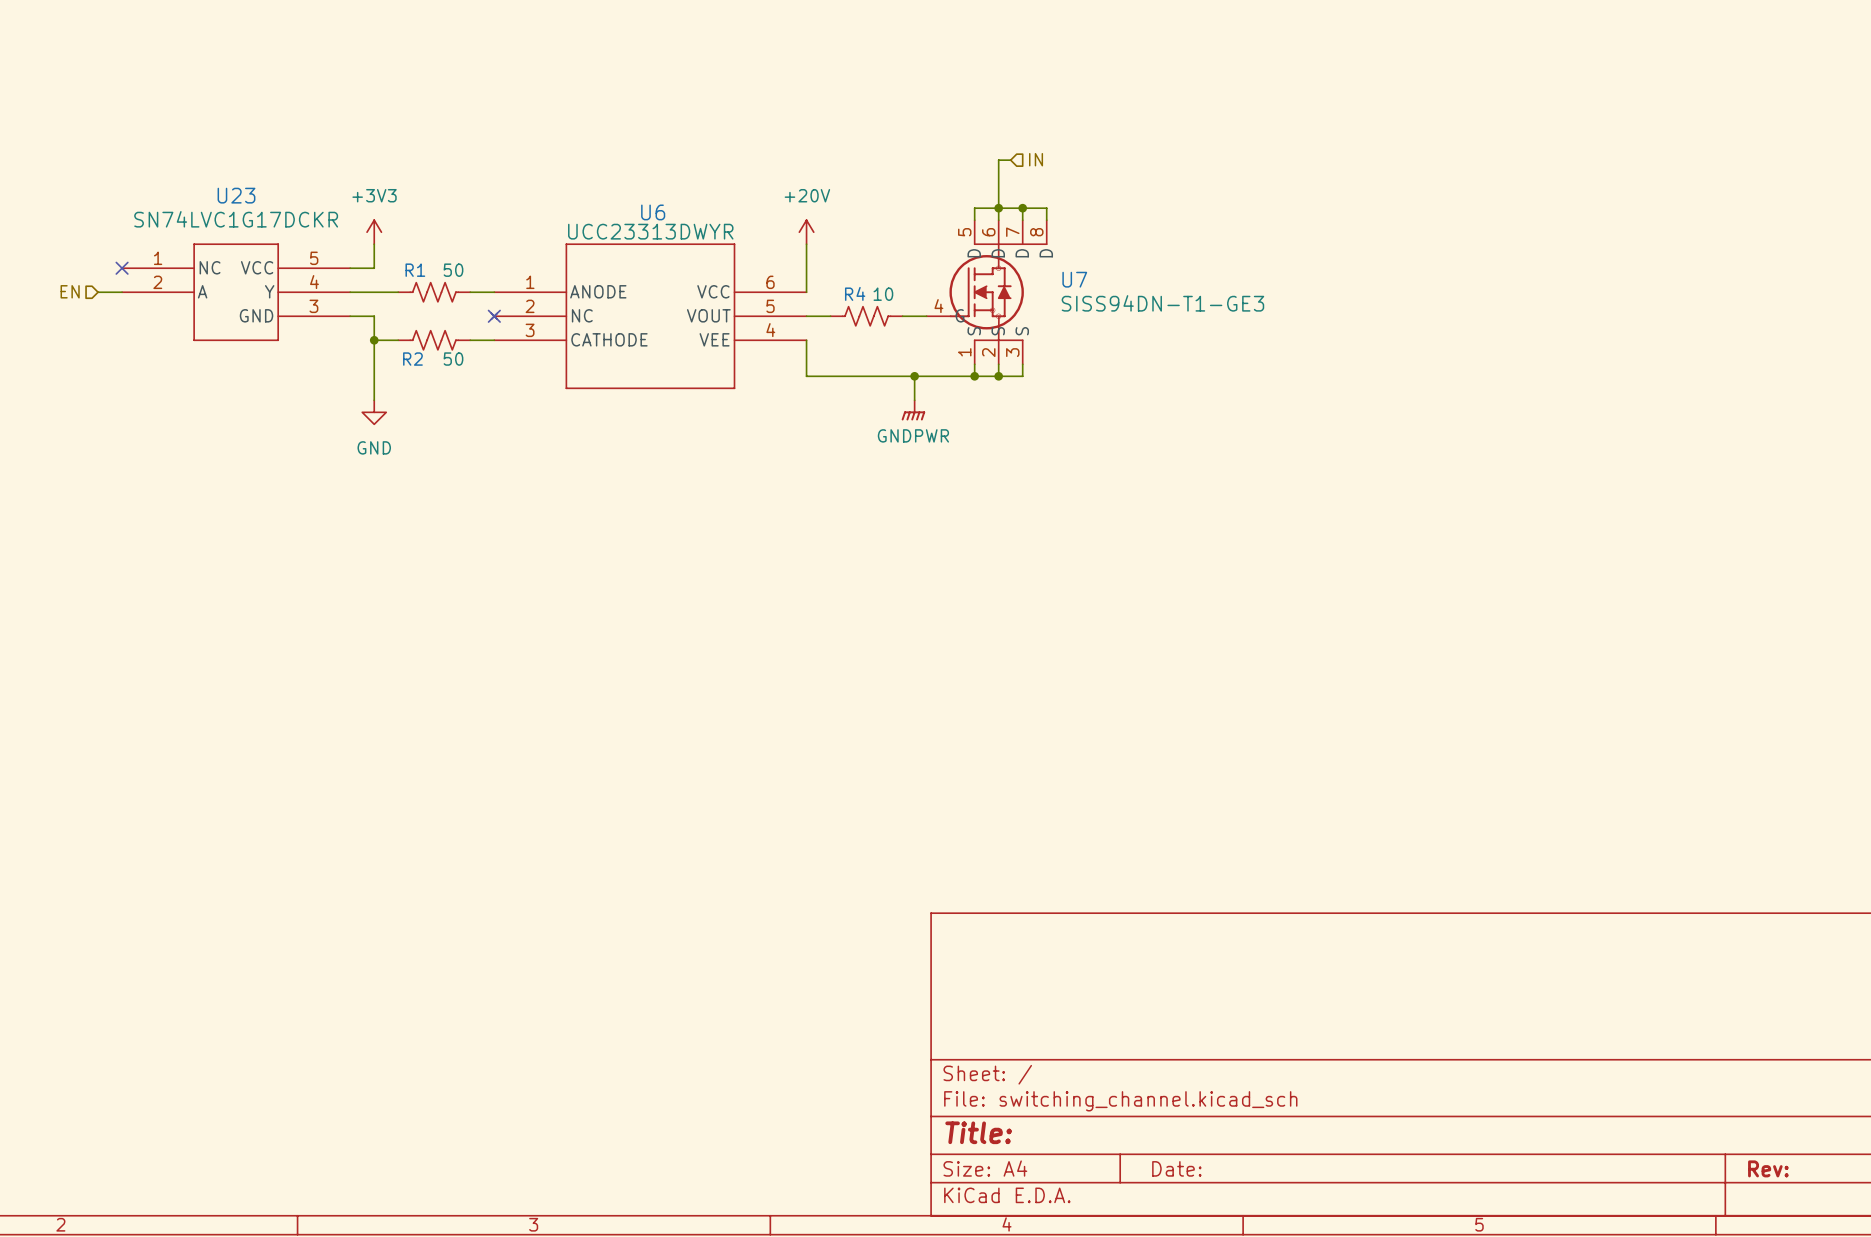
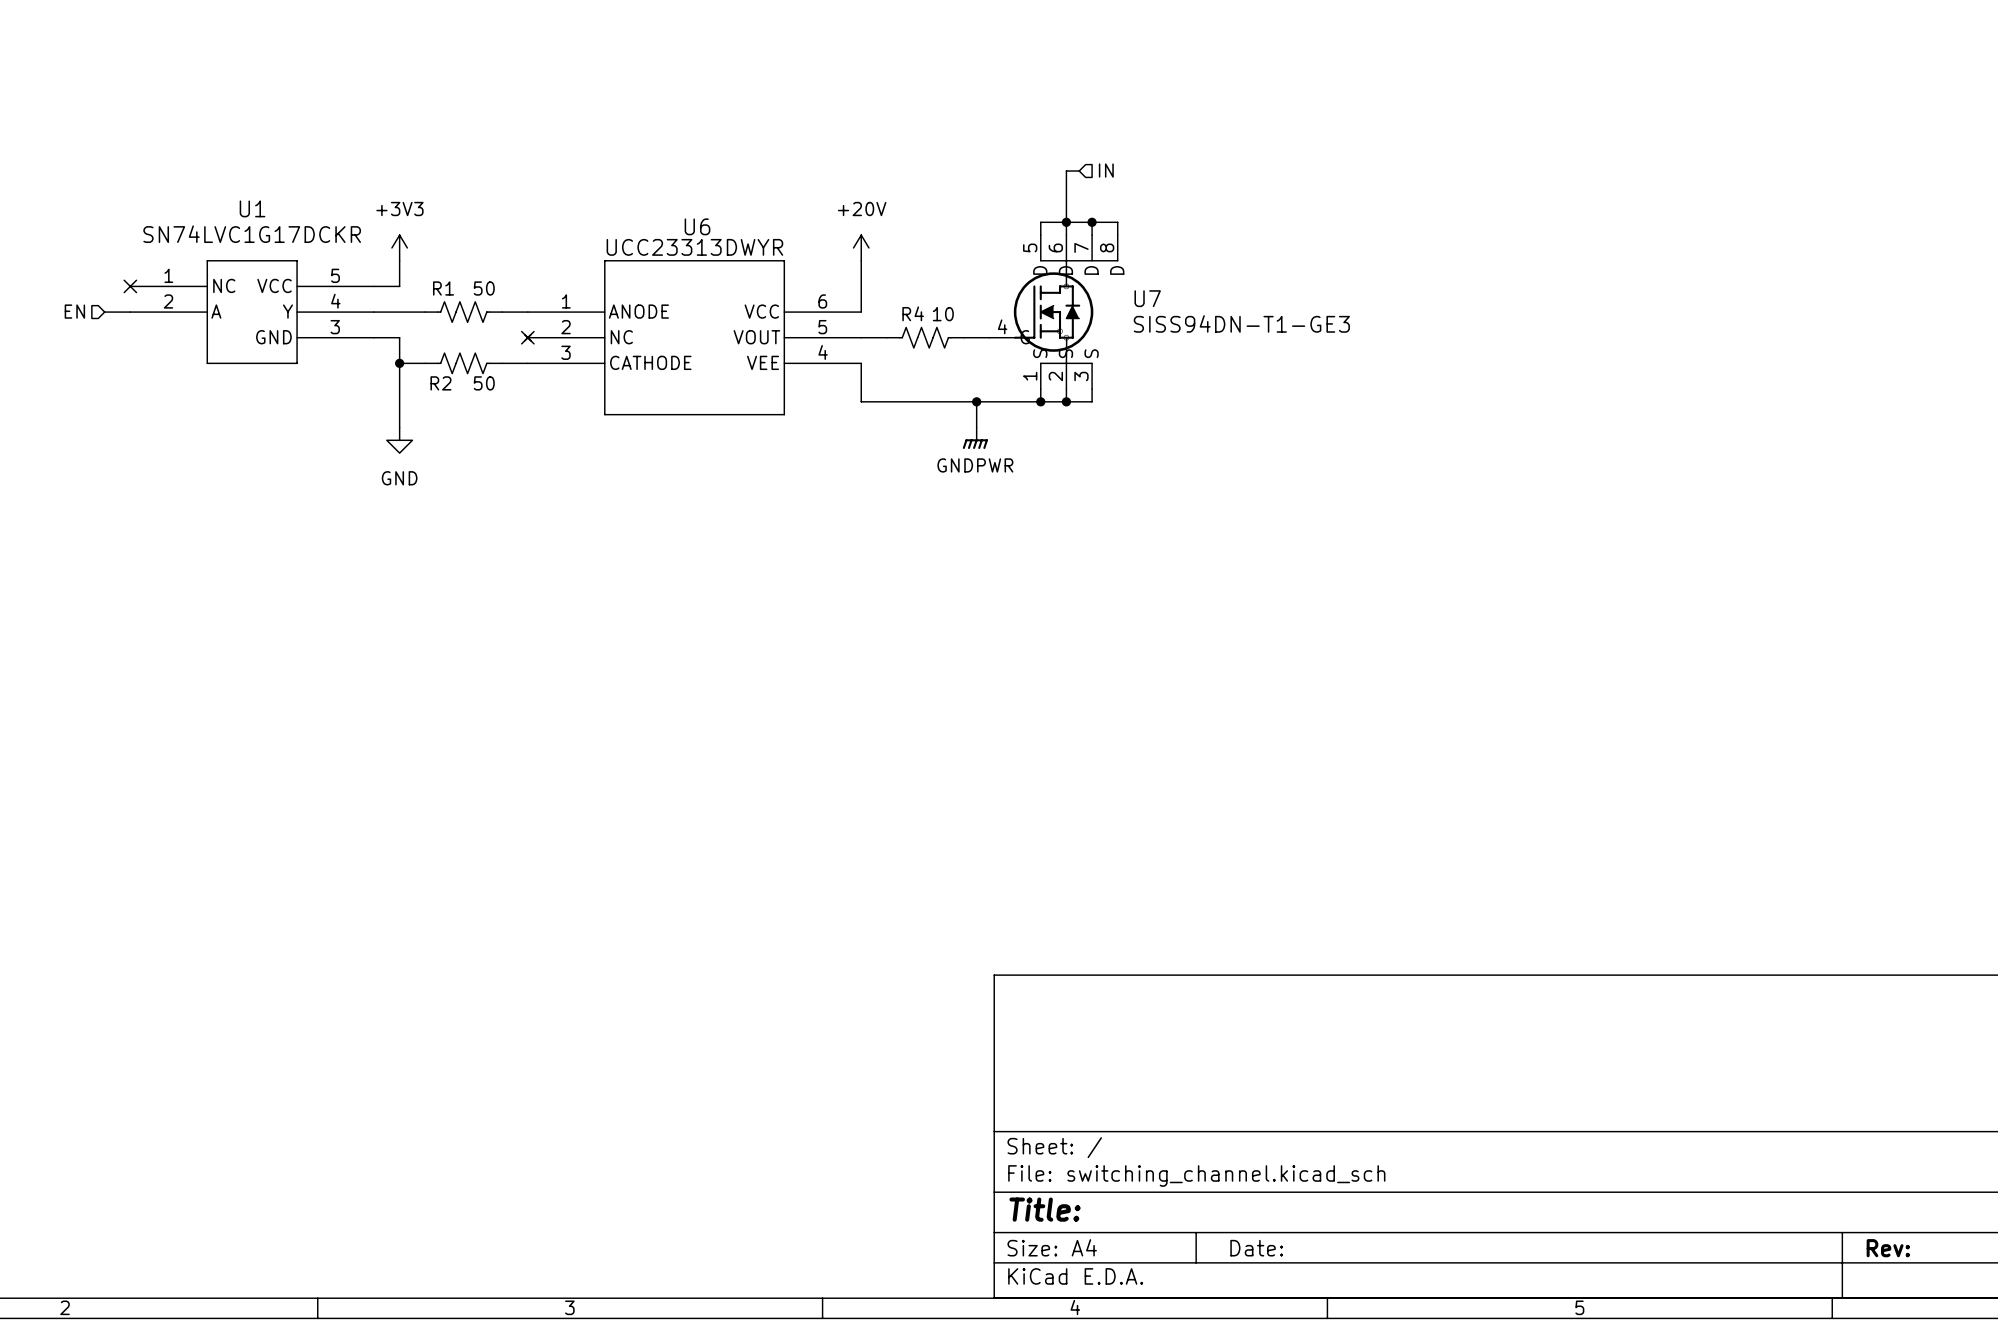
U23 name: U23 (236, 195) -> U1 (252, 208)

